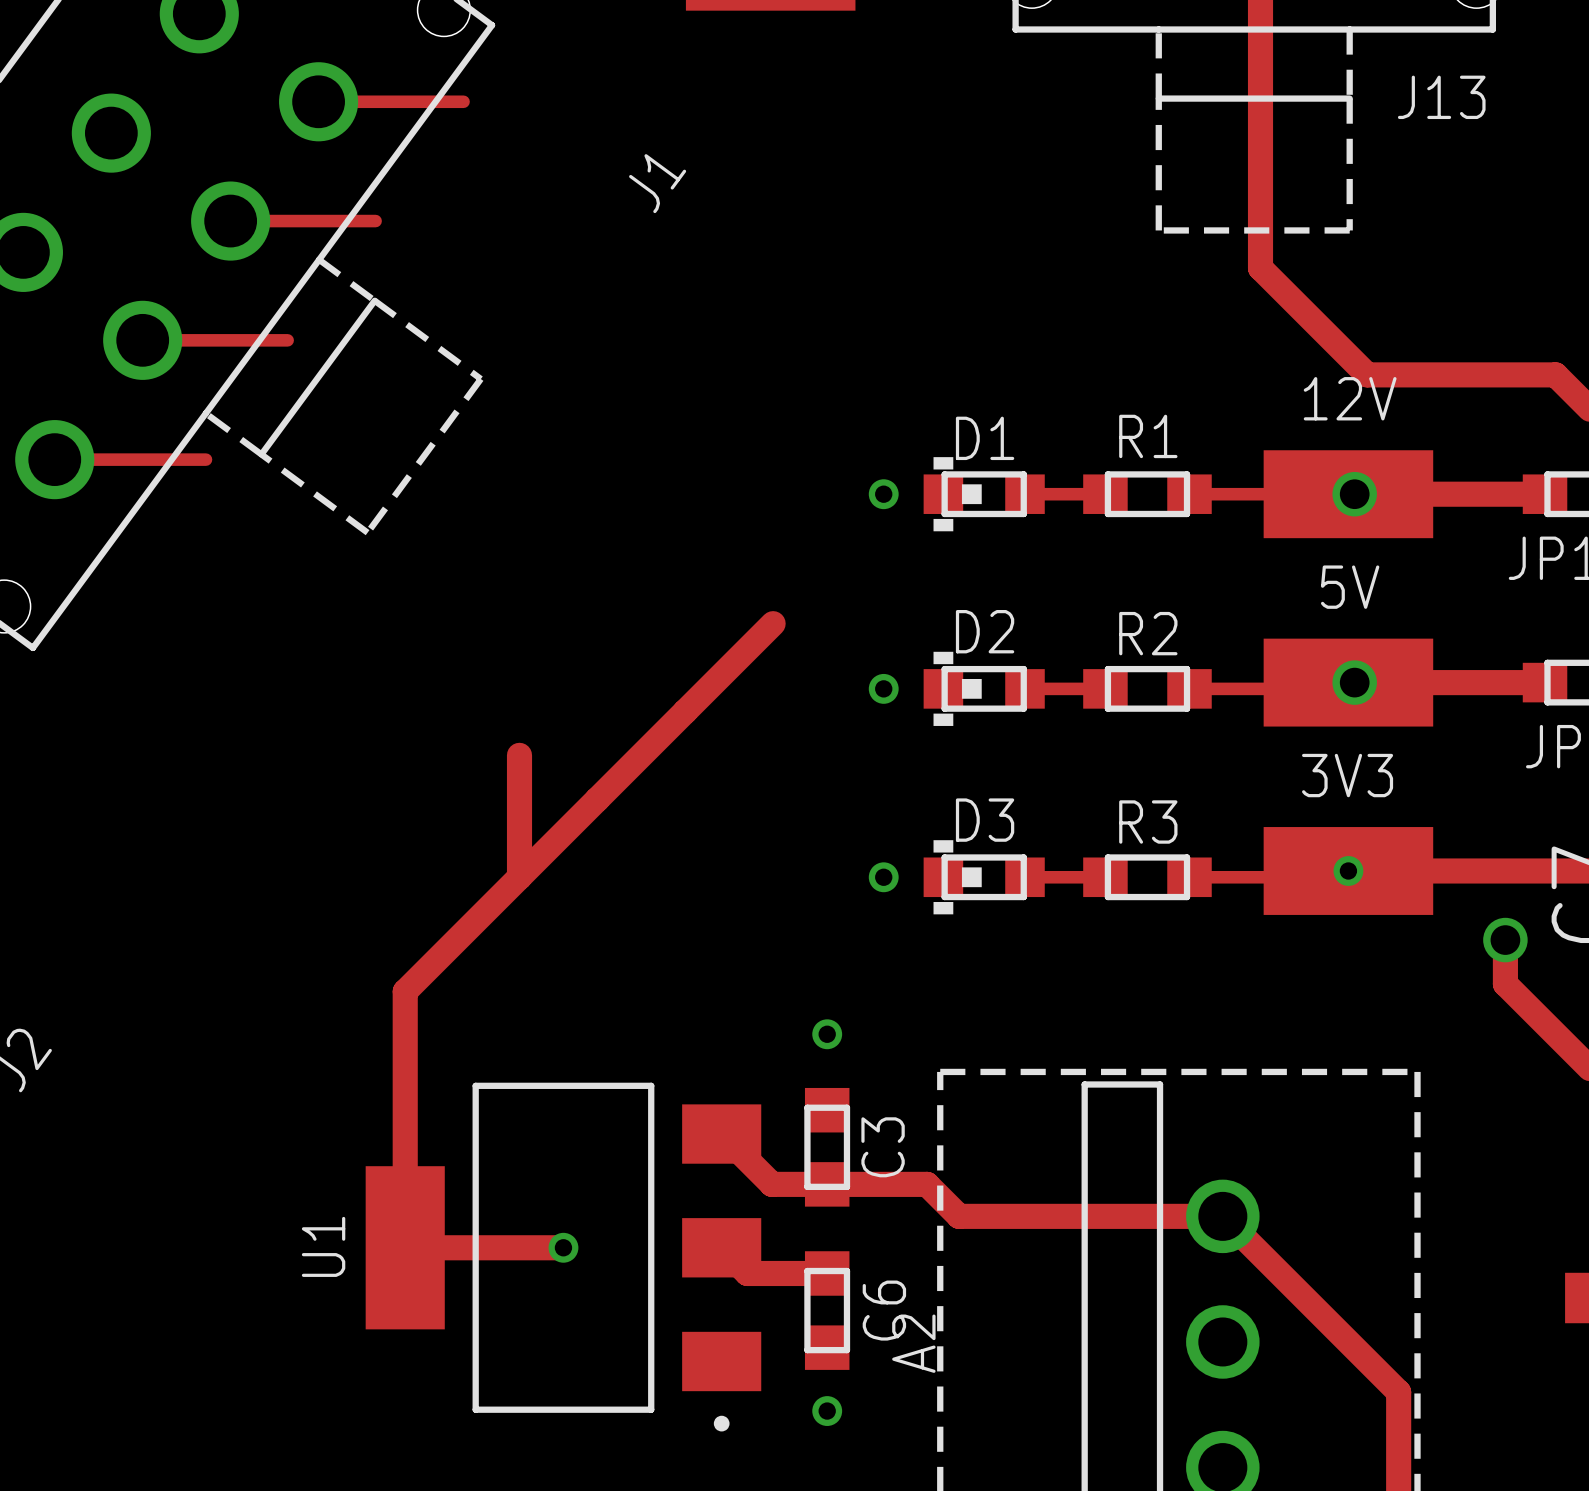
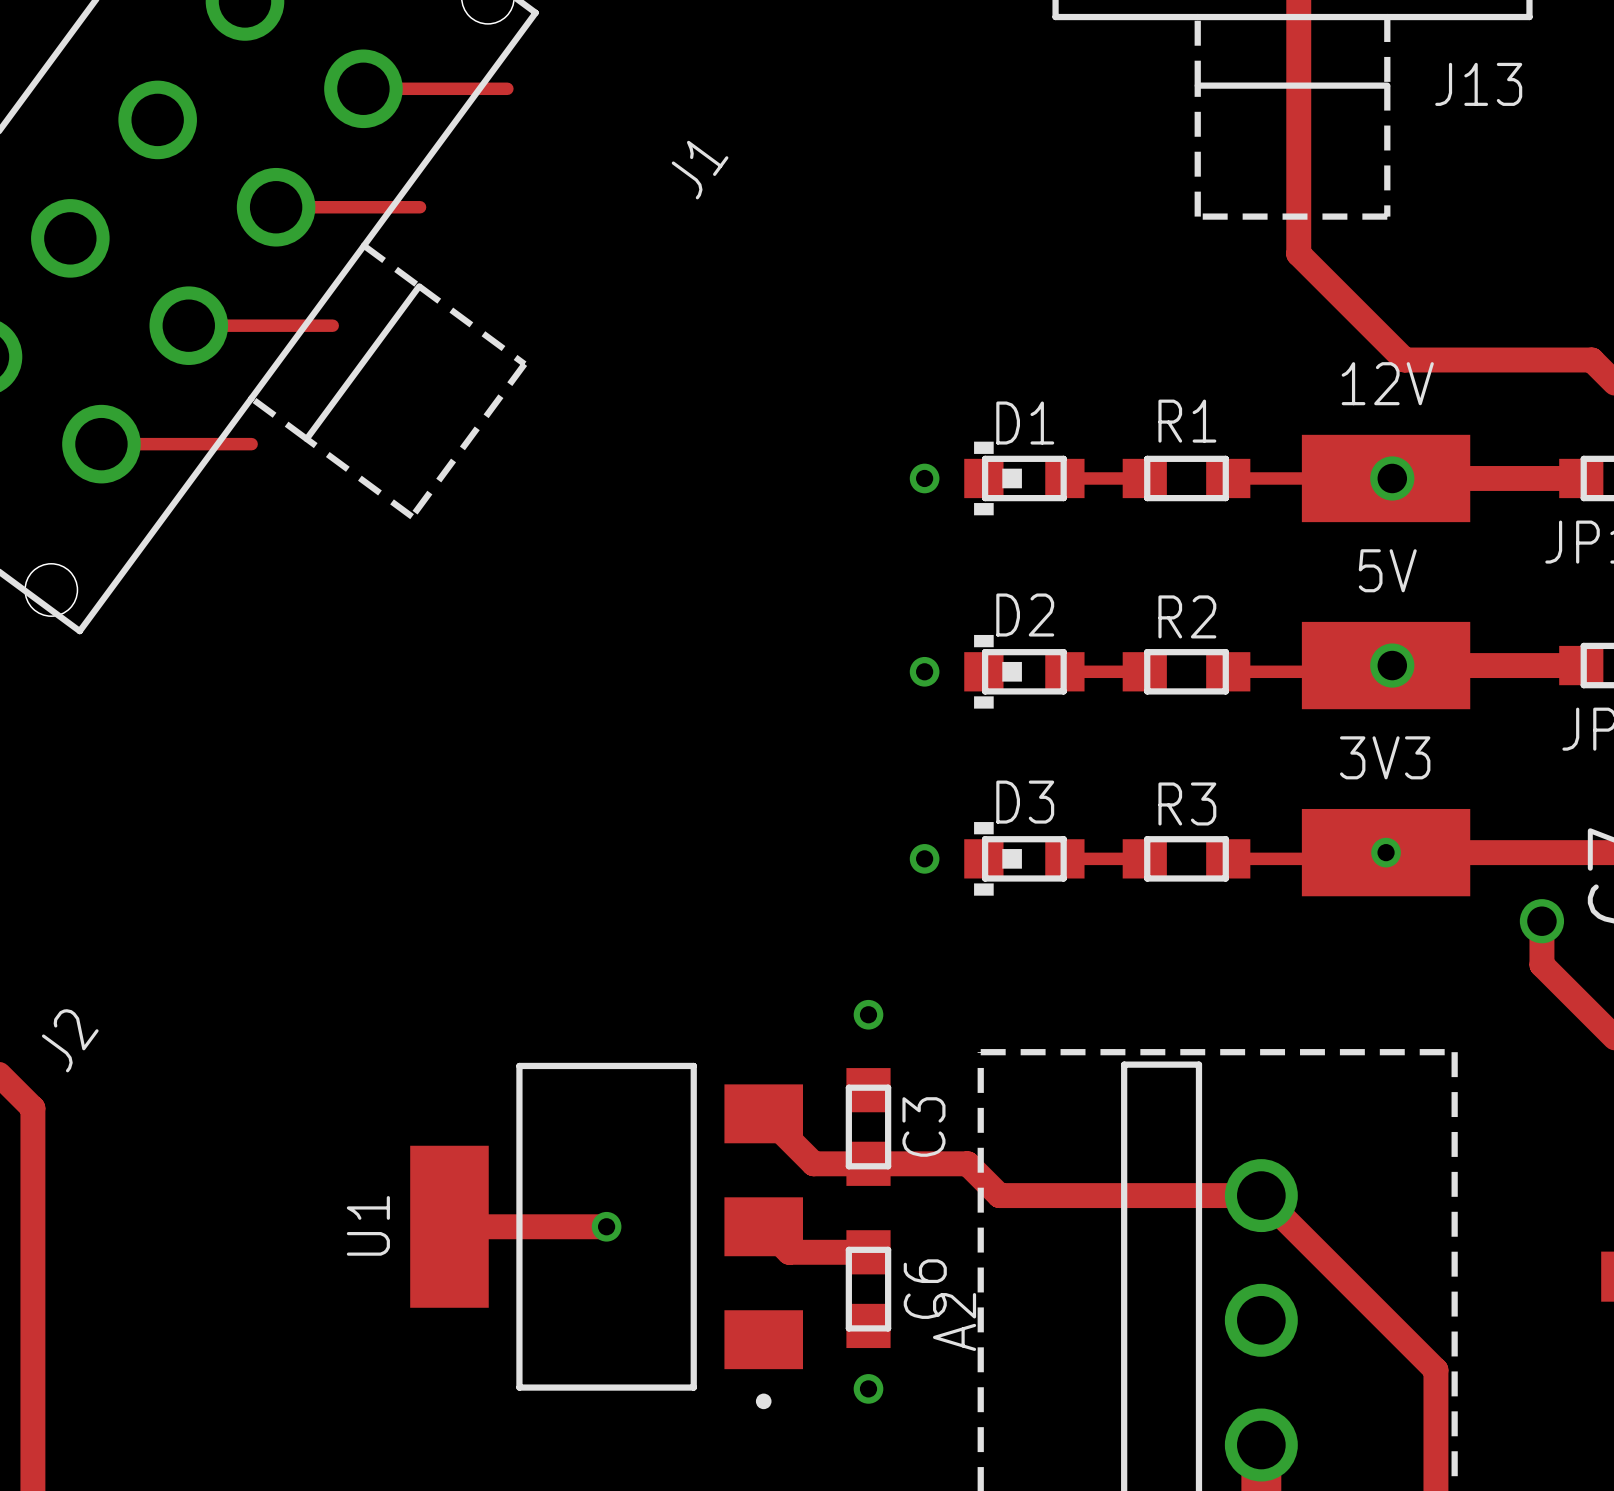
track: (773, 623) (405, 991) (405, 1247) -> none
track: (519, 755) (519, 877) -> none

